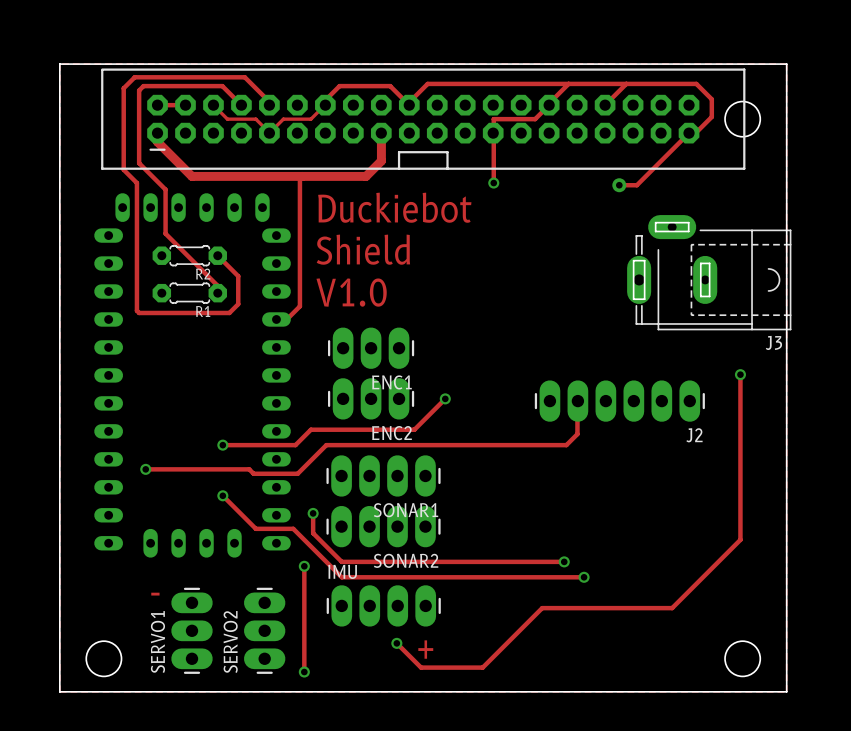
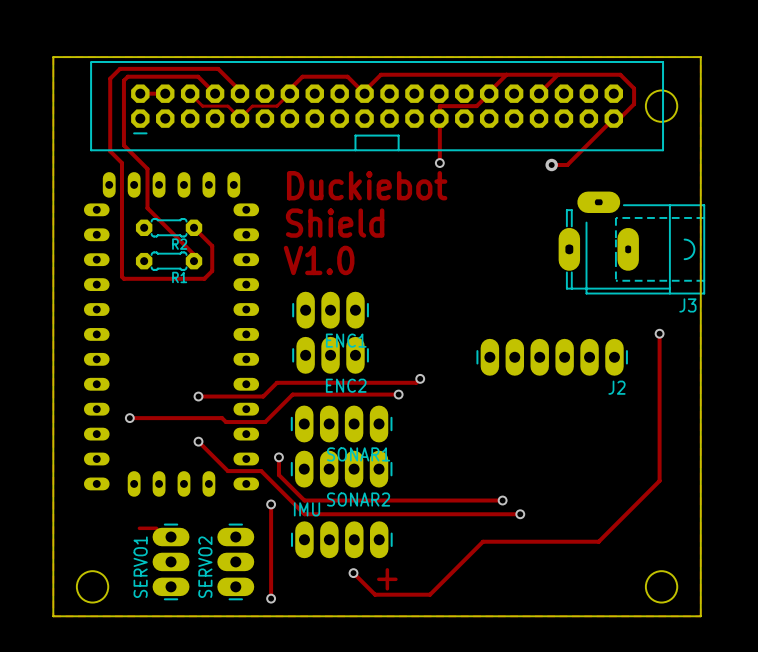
track: (157, 133) (157, 141) (192, 176) (366, 176) (381, 161) (381, 133) -> none
track: (302, 176) (299, 178) (299, 306) (286, 319) (276, 319) -> none
track: (445, 398) (414, 429) -> (420, 378) (416, 382) (369, 382)
via: (445, 398) -> none
track: (577, 401) (577, 434) (566, 445) (326, 445) -> (398, 394) (292, 394) (290, 396)
via: none -> (420, 378)
via: none -> (398, 394)

